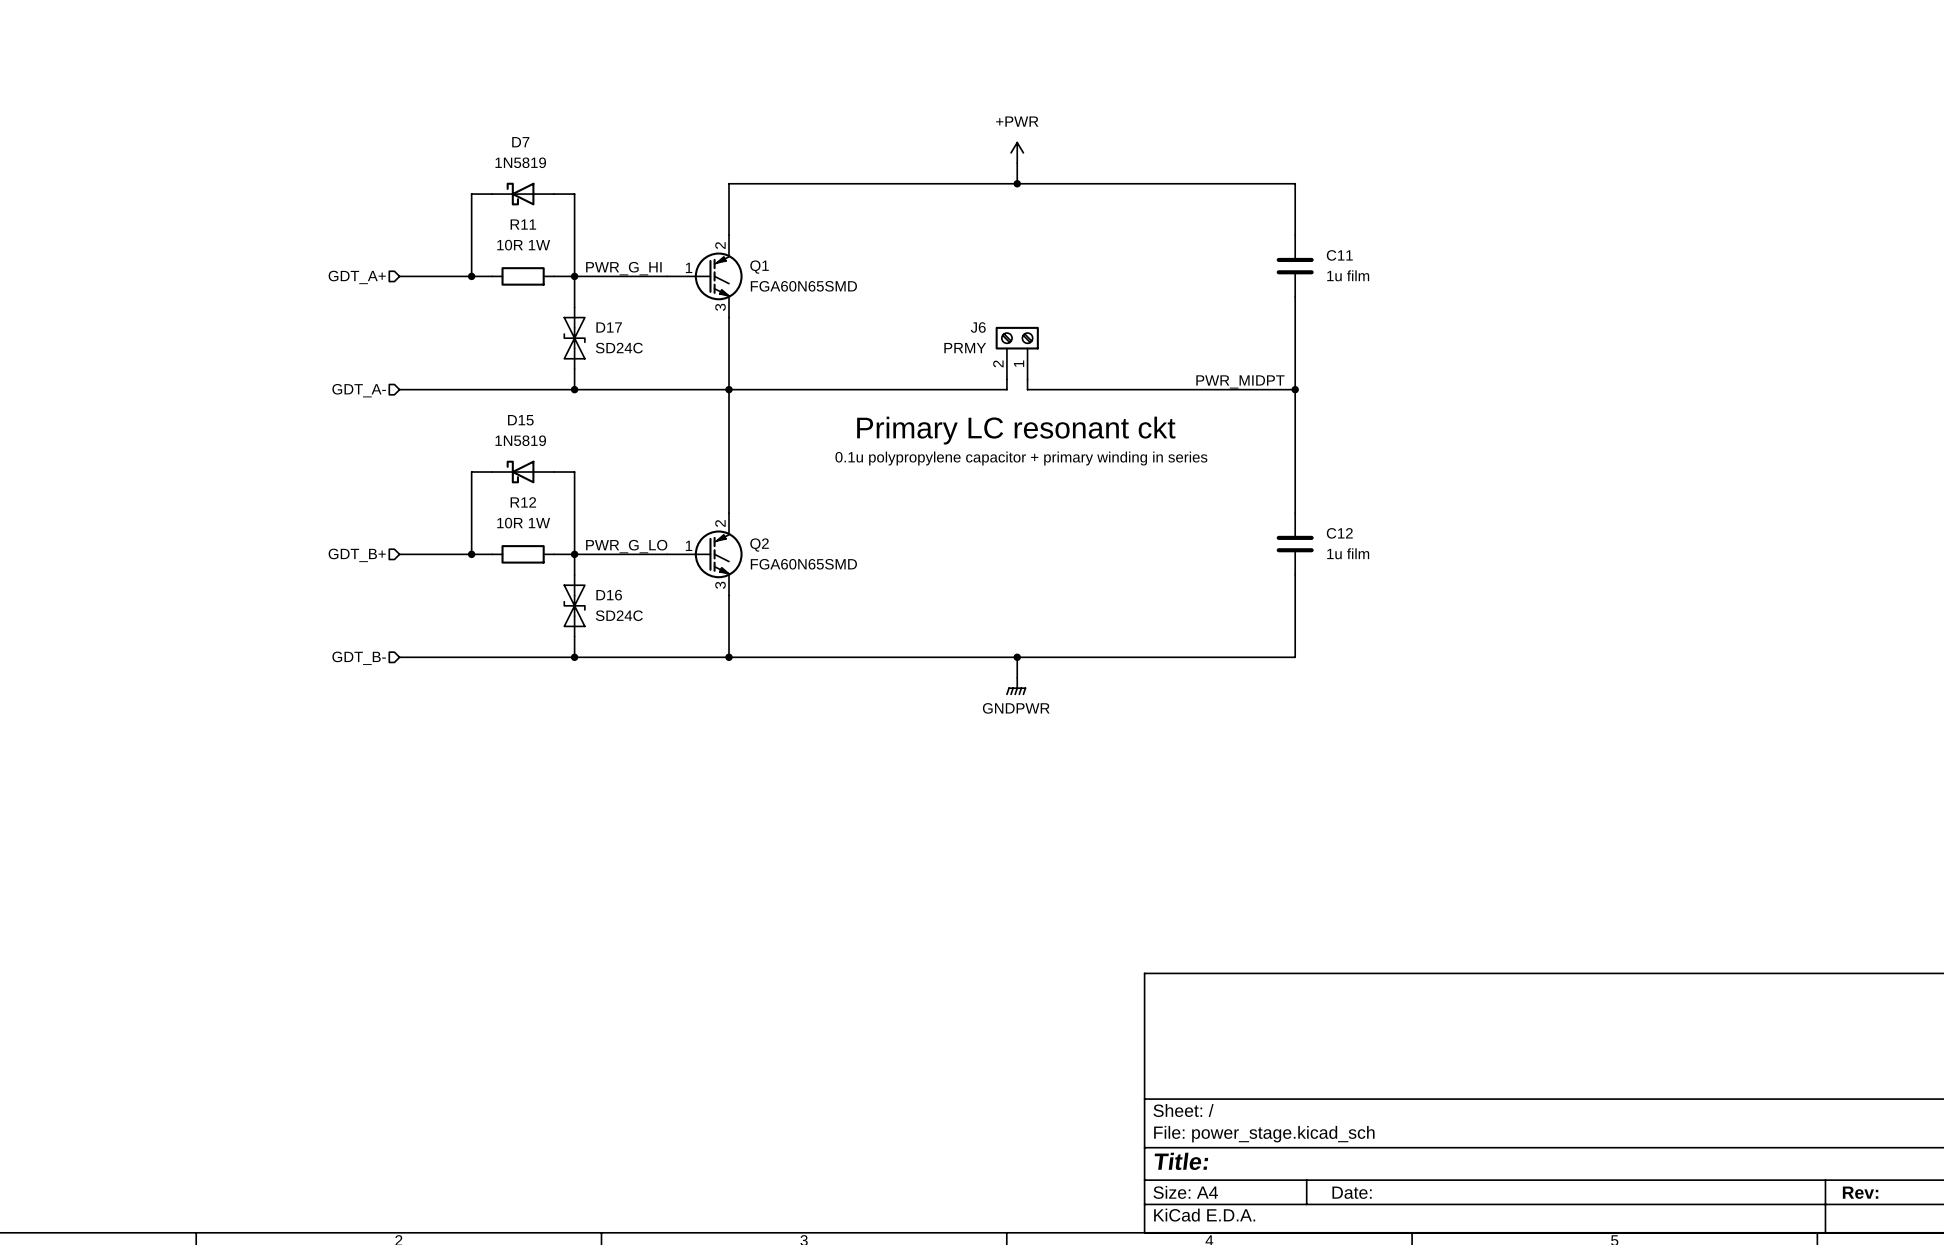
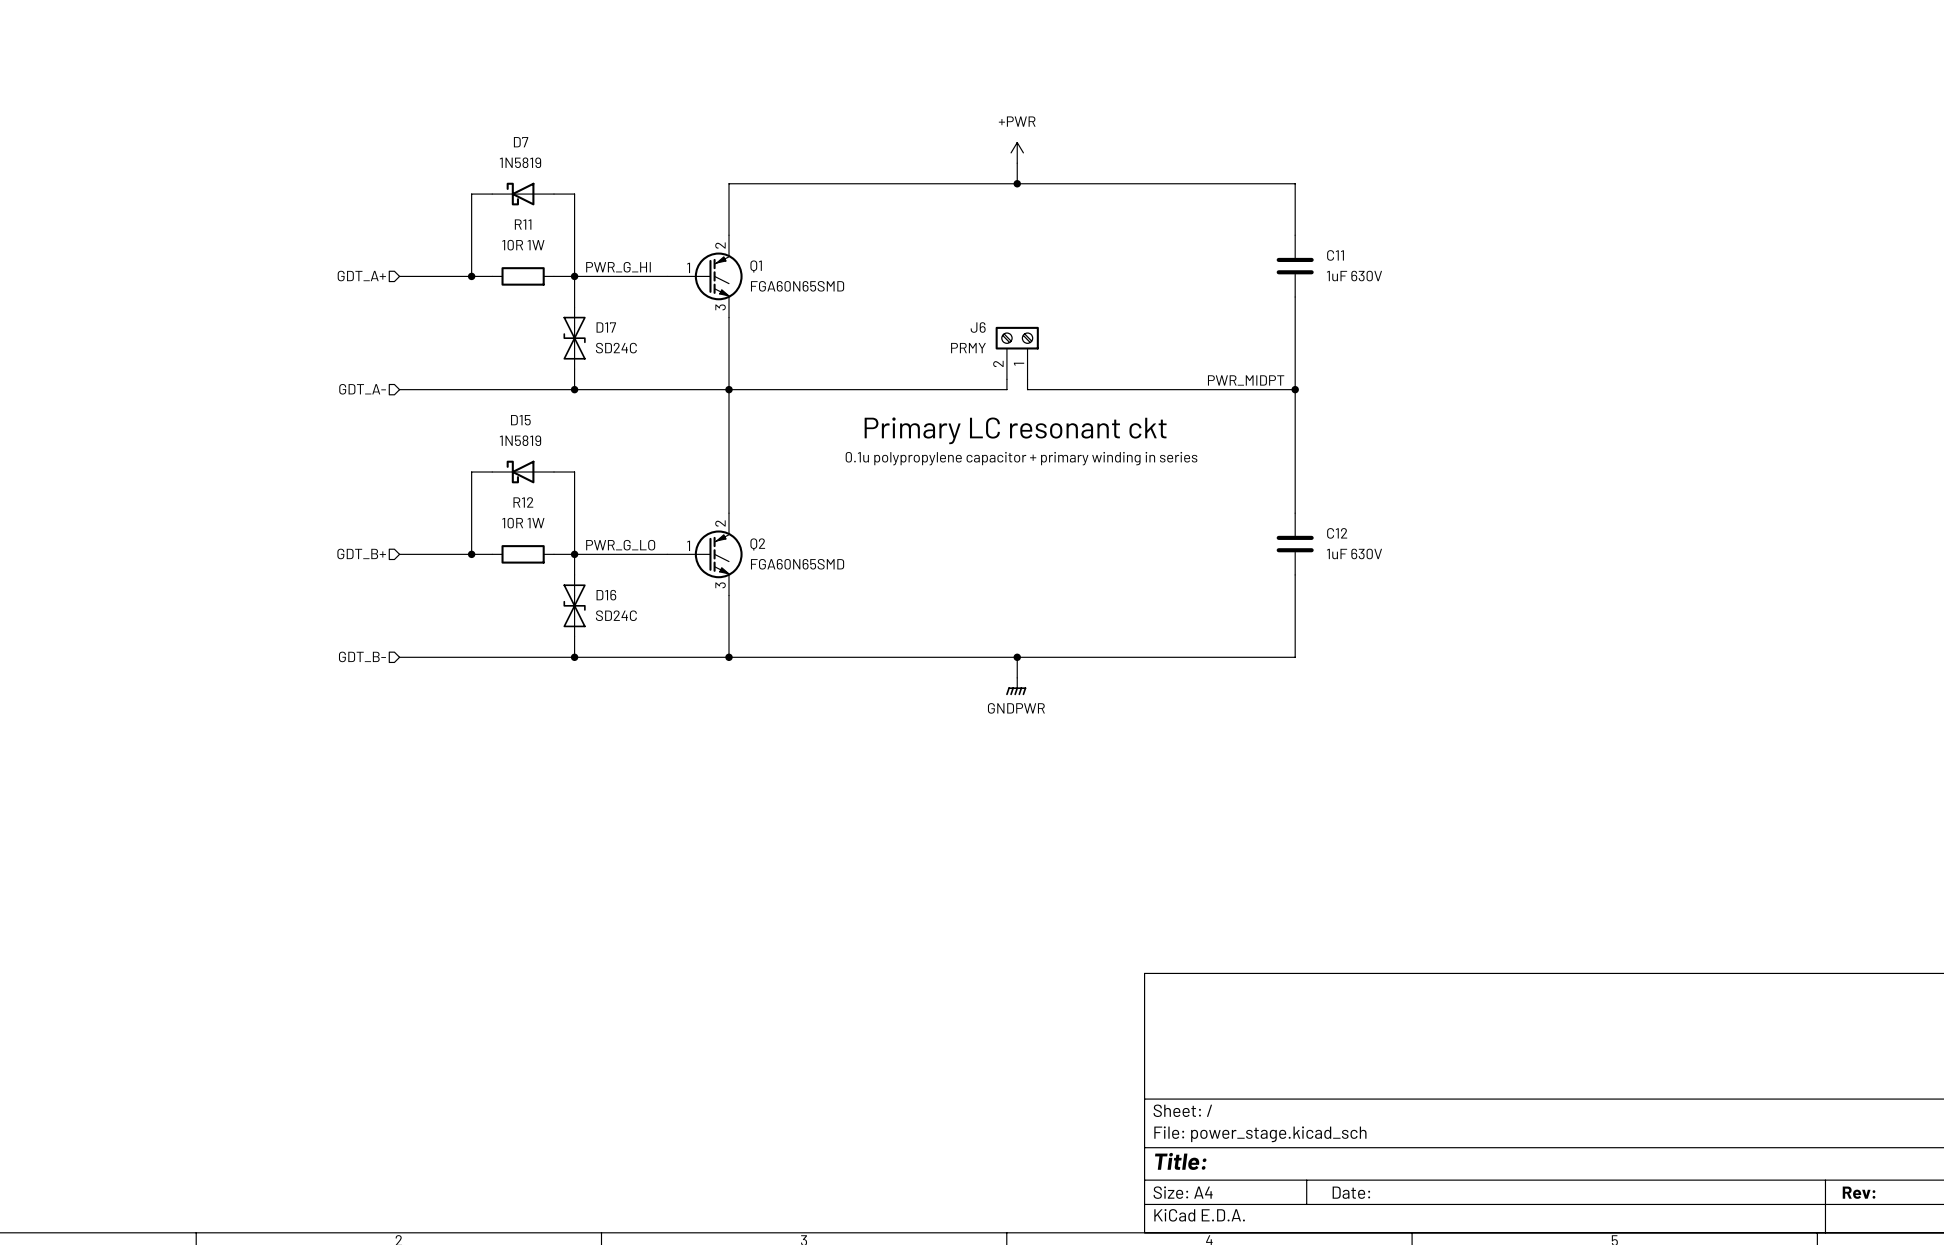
C11 value: 1u film (1348, 275) -> 1uF 630V (1354, 276)
C12 value: 1u film (1348, 553) -> 1uF 630V (1354, 553)

